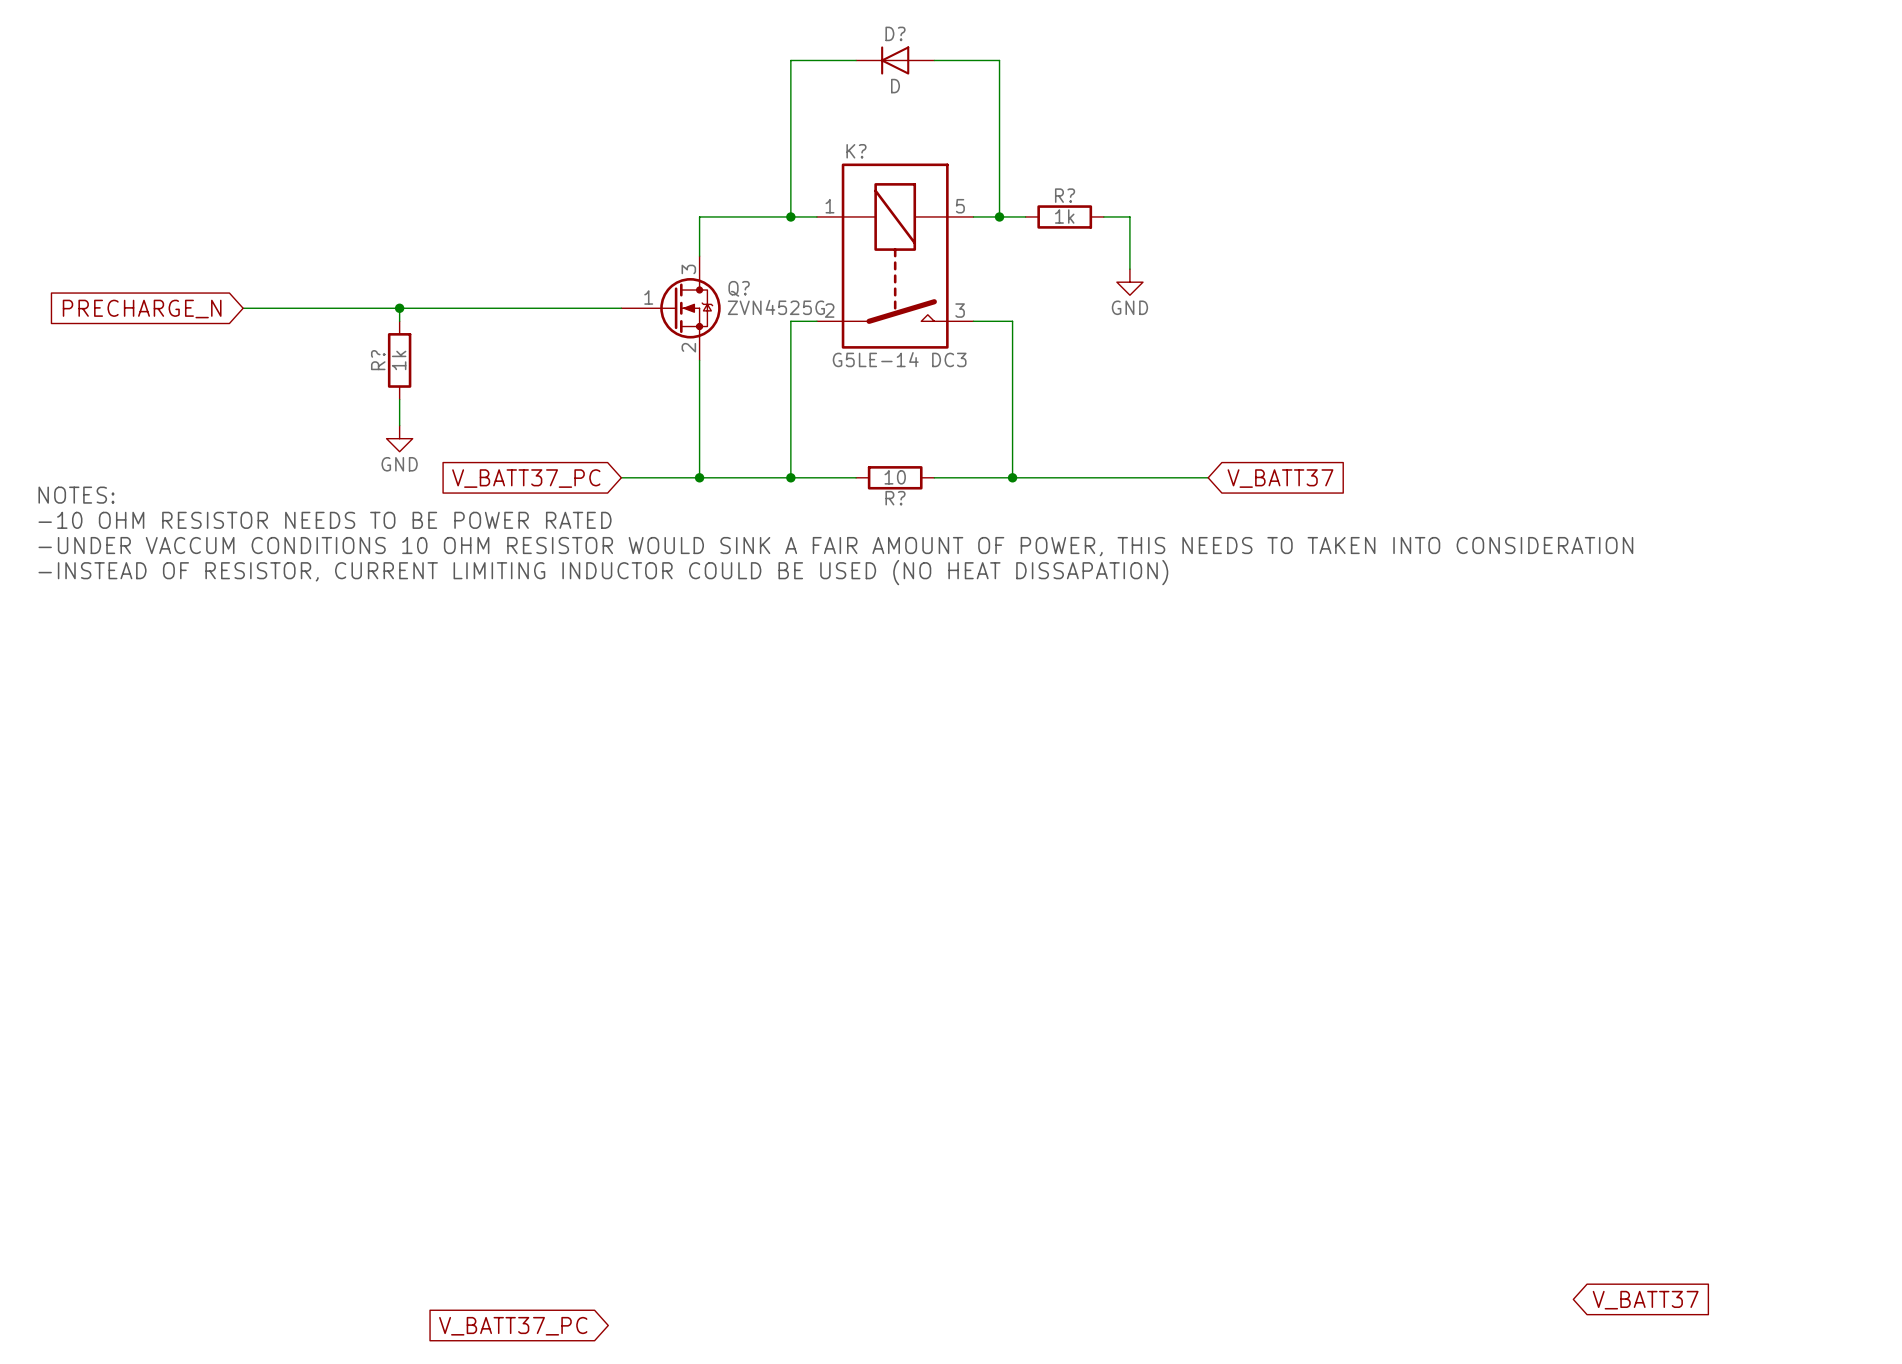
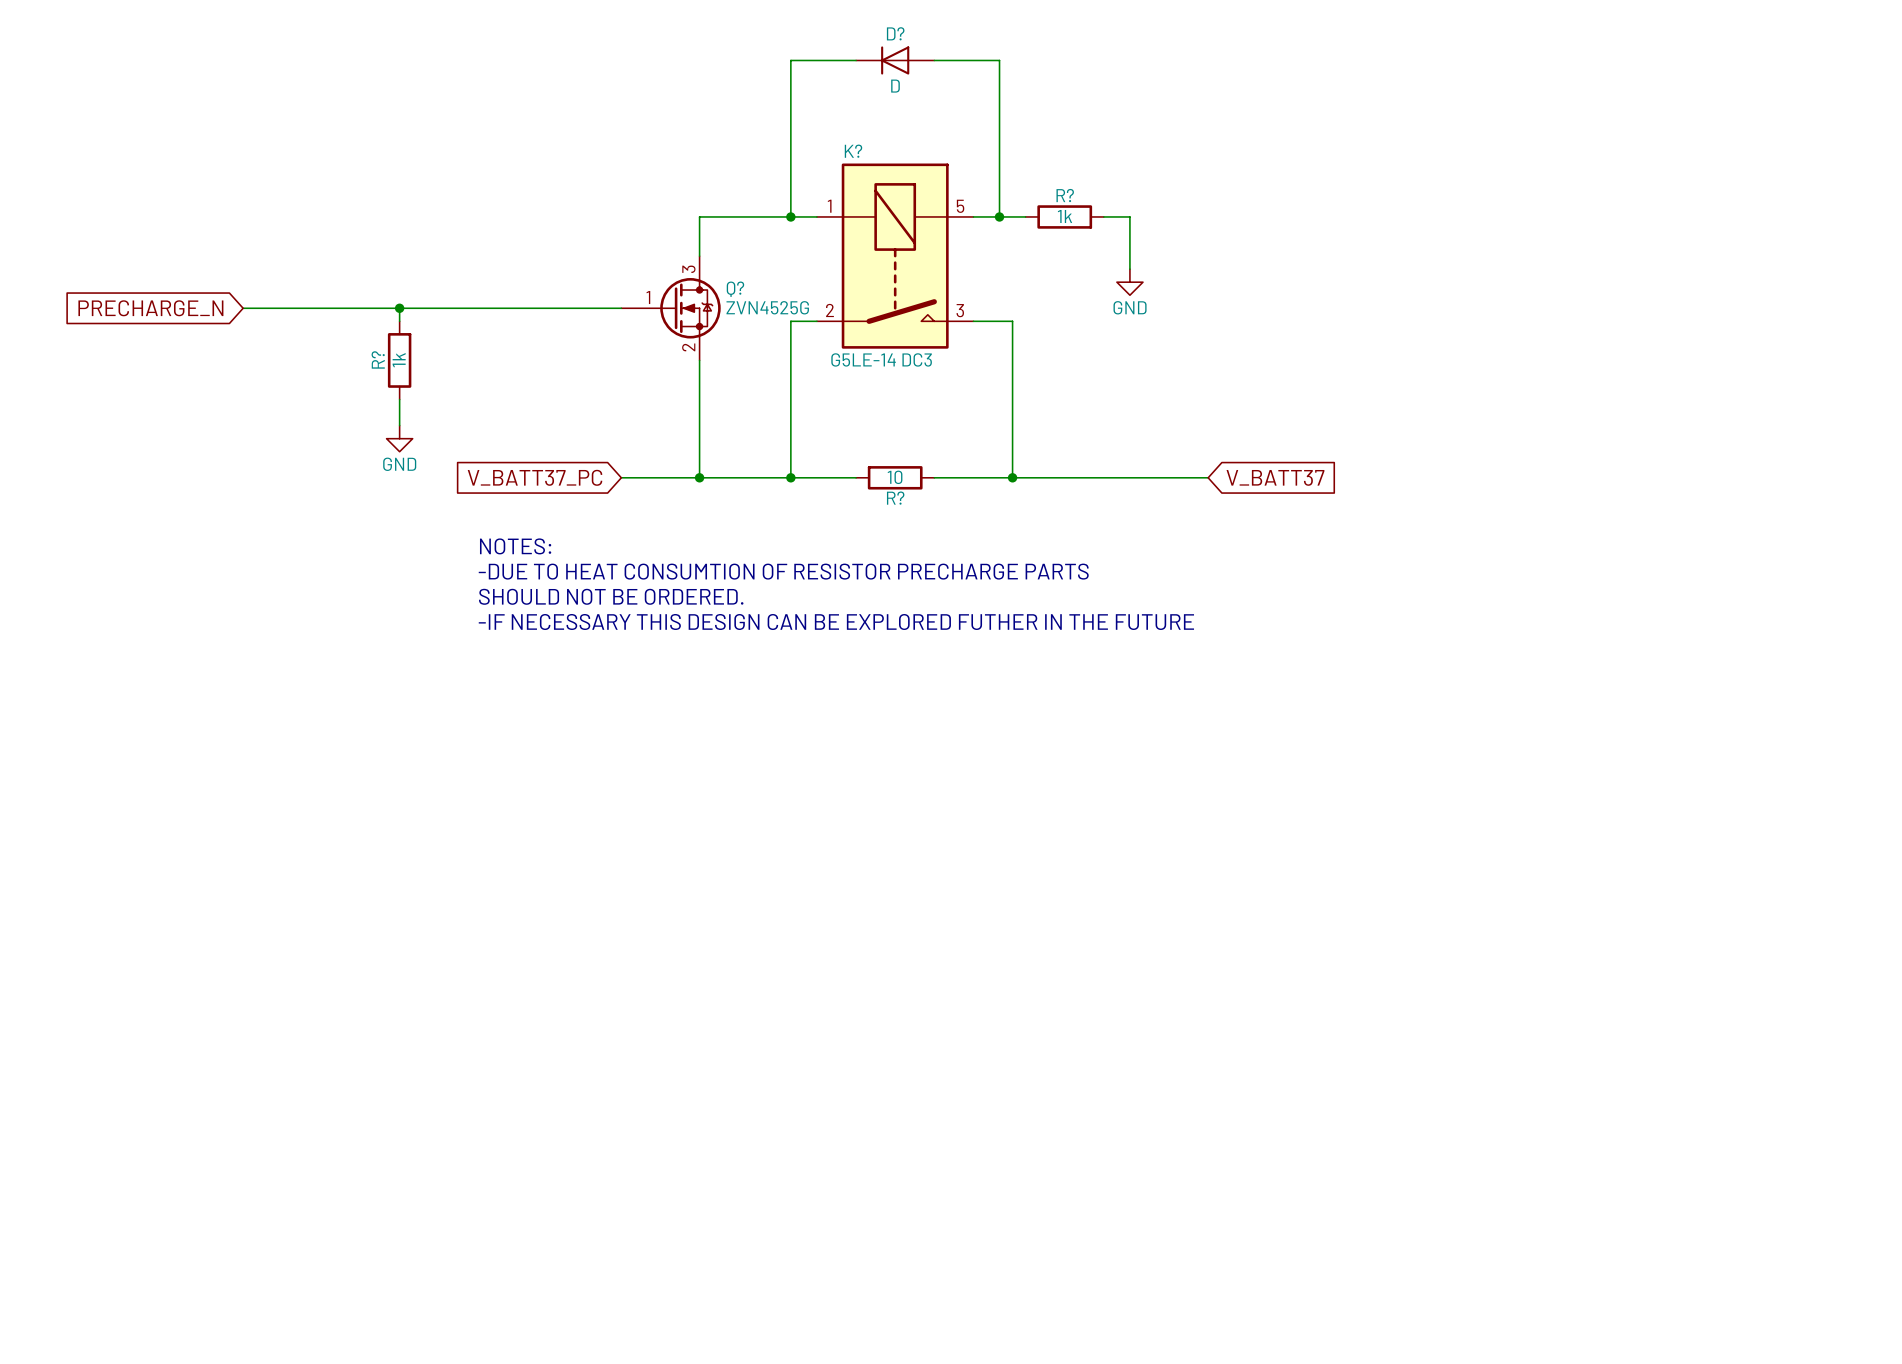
text: NOTES: (76, 495) -> none
text: -10 OHM RESISTOR NEEDS TO BE POWER RATED (325, 520) -> none
text: none -> NOTES: (515, 546)
text: -UNDER VACCUM CONDITIONS 10 OHM RESISTOR WOULD SINK A FAIR AMOUNT OF POWER, THIS NEEDS TO TAKEN INTO CONSIDERATION (835, 546) -> none
text: none -> -DUE TO HEAT CONSUMTION OF RESISTOR PRECHARGE PARTS (783, 571)
text: -INSTEAD OF RESISTOR, CURRENT LIMITING INDUCTOR COULD BE USED (NO HEAT DISSAPATION) (603, 572) -> none
text: none -> SHOULD NOT BE ORDERED. (611, 596)
text: none -> -IF NECESSARY THIS DESIGN CAN BE EXPLORED FUTHER IN THE FUTURE (836, 622)
global label: V_BATT37 (1645, 1300) -> none
global label: V_BATT37_PC (513, 1326) -> none

